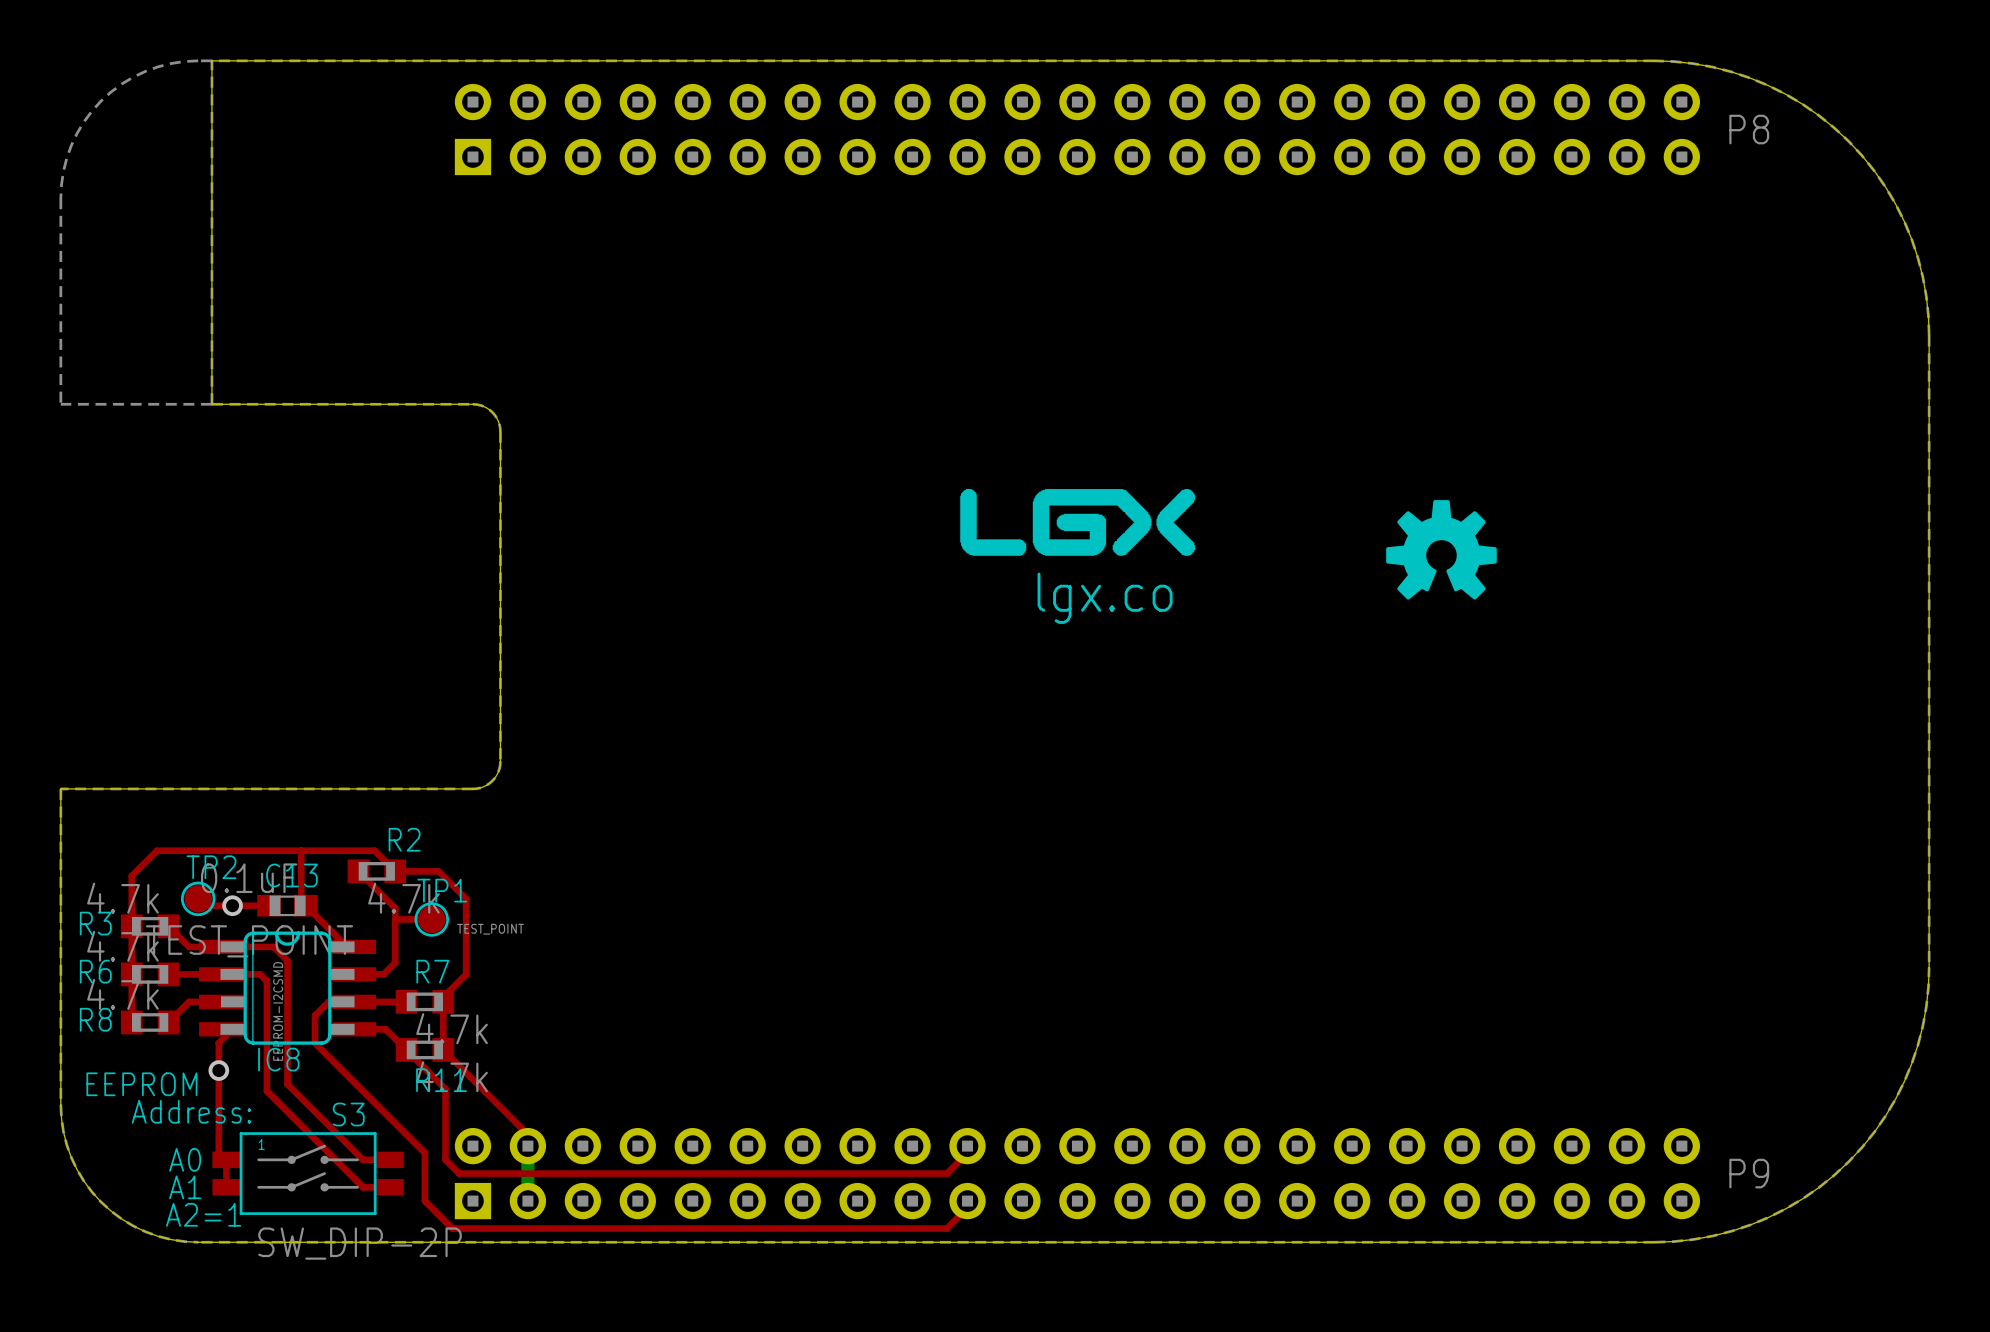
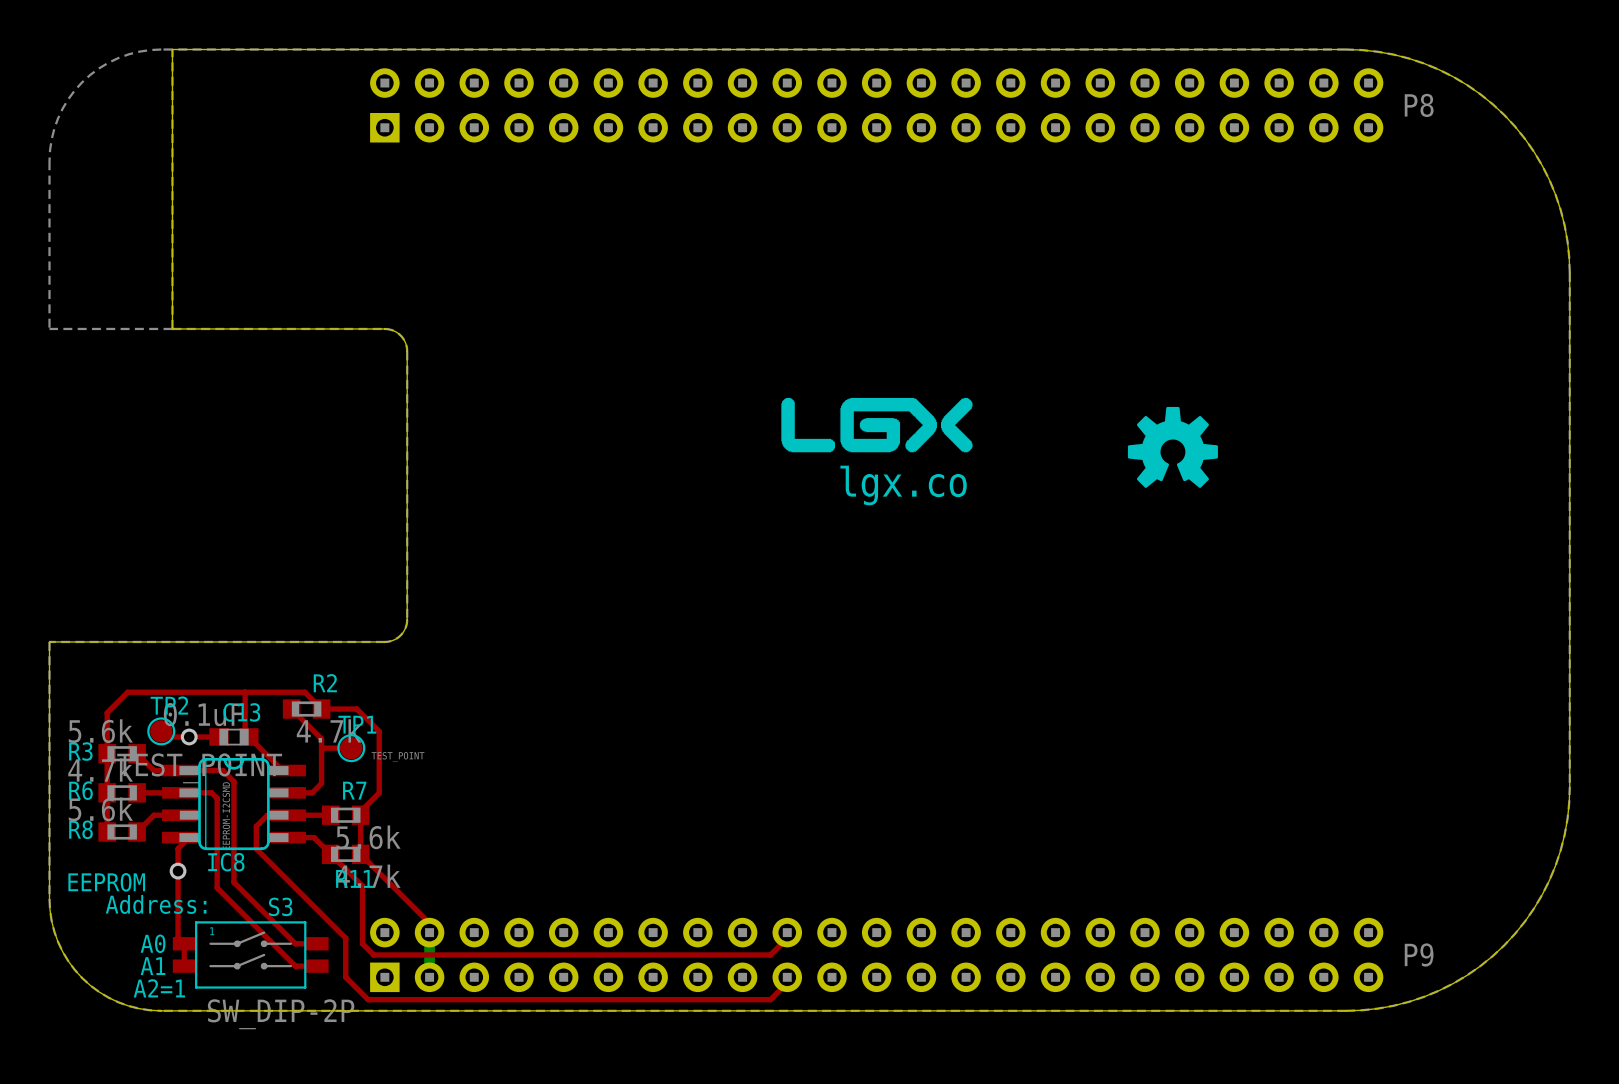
R3 value: 4.7k (122, 898) -> 5.6k (100, 731)
R8 value: 4.7k (122, 994) -> 5.6k (100, 809)
R7 value: 4.7k (452, 1028) -> 5.6k (368, 837)

